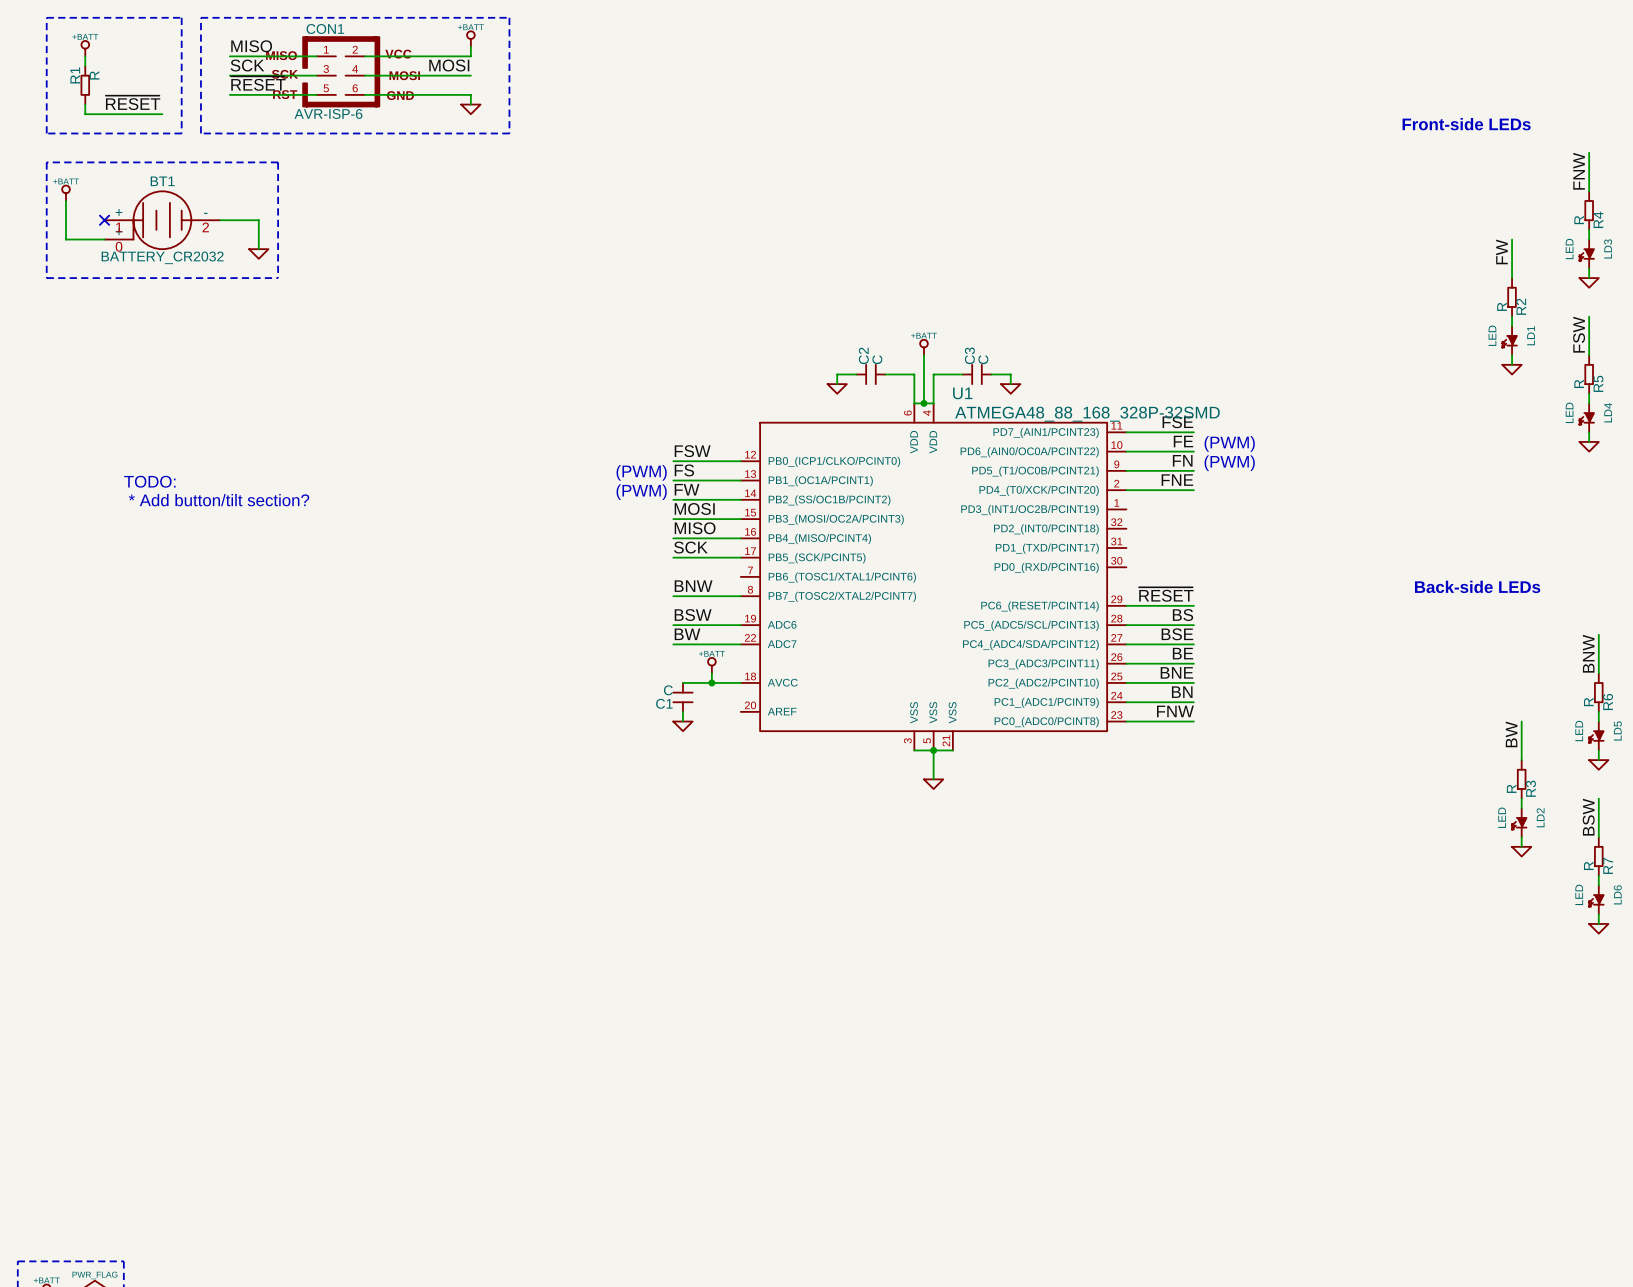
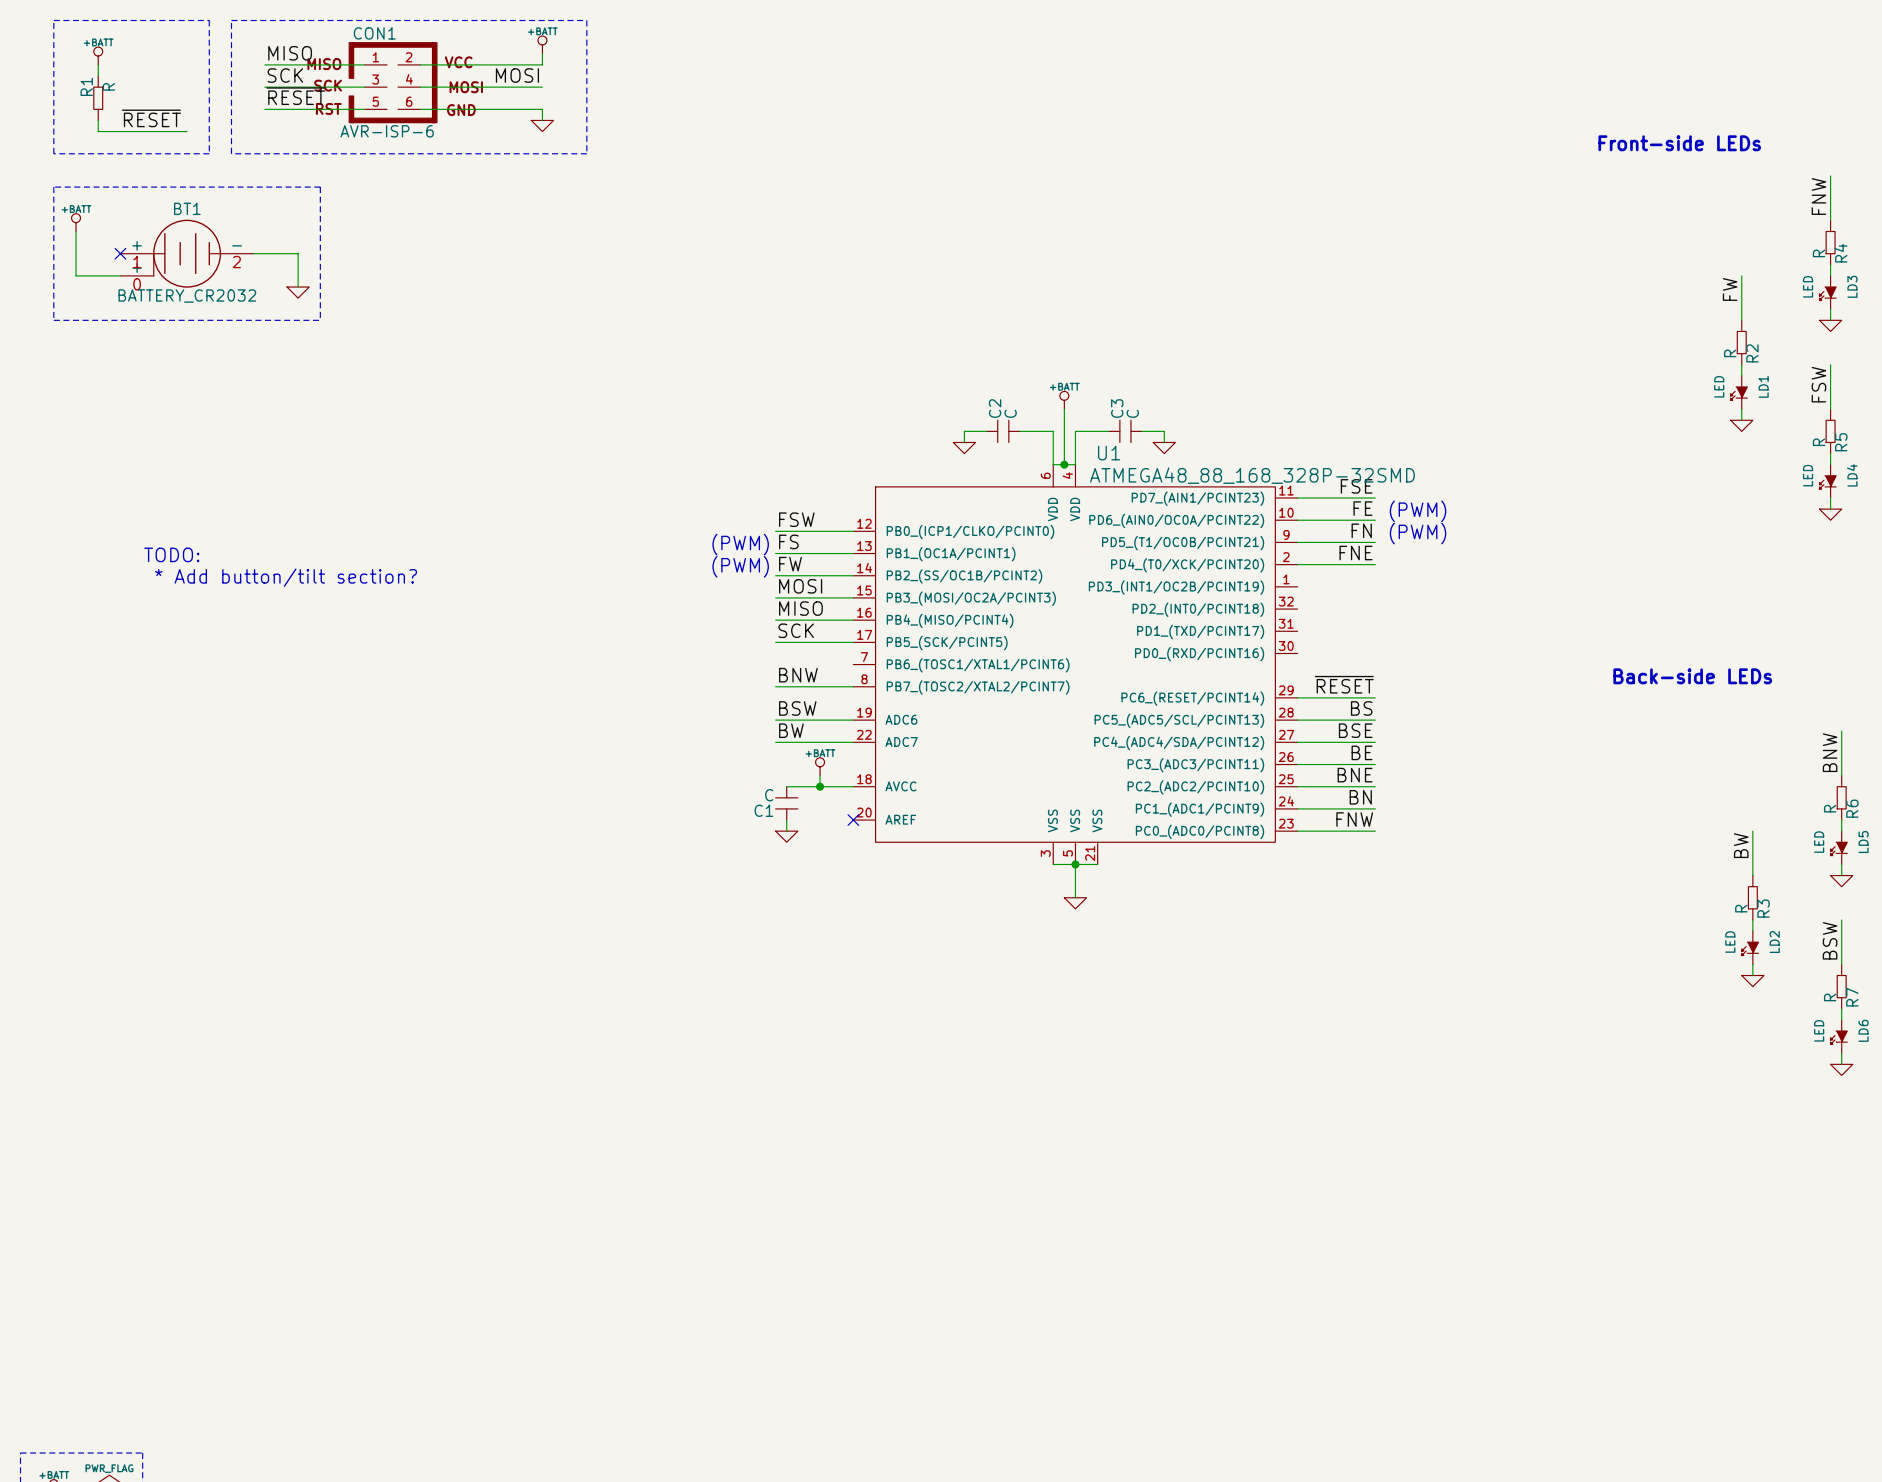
no-connect mark: none -> (853, 820)

